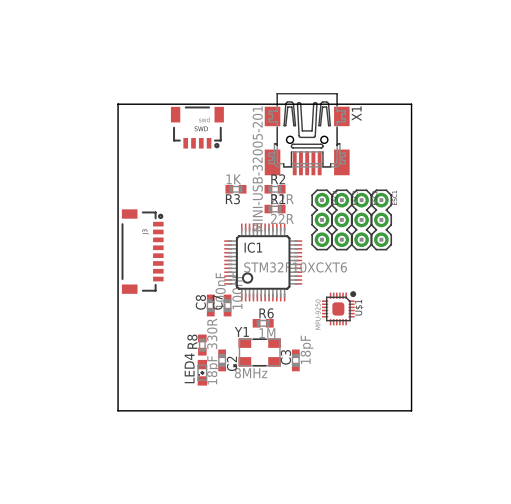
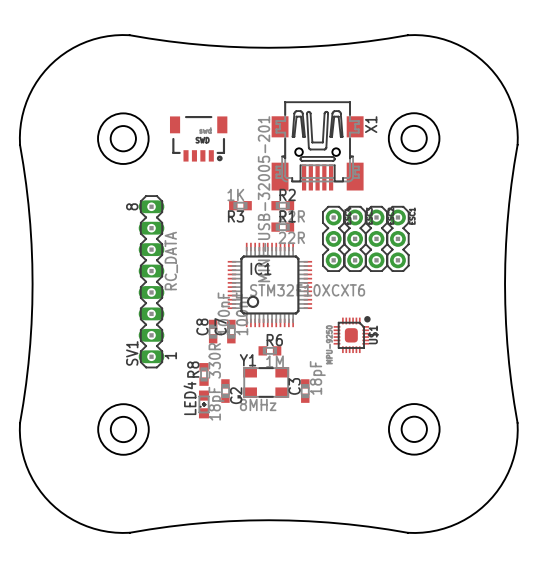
board edge: none -> (129, 35) (188, 43) (268, 47) (328, 45) (407, 35) (422, 35) (443, 39) (464, 47) (482, 60) (496, 76) (511, 101) (517, 130) (517, 144) (507, 224) (505, 283) (507, 343) (517, 422) (517, 437) (513, 459) (504, 479) (492, 497) (476, 512) (451, 526) (422, 532) (407, 532) (328, 522) (268, 520) (209, 522) (129, 532) (115, 532) (93, 528) (73, 520) (55, 507) (40, 491) (26, 466) (20, 437) (20, 423) (30, 343) (32, 284) (30, 224) (20, 145) (22, 116) (29, 95) (36, 82) (50, 65) (61, 55) (79, 44) (93, 39) (107, 36) (129, 35)
round board edge: none -> [388, 113, 440, 164]
round board edge: none -> [98, 113, 149, 164]
board edge: (118, 104) (411, 104) (411, 410) (118, 410) (118, 104) -> none
round board edge: none -> [110, 126, 136, 152]
round board edge: none -> [401, 125, 427, 152]
part: (142, 251) -> none
SV1: none -> RC_DATA (151, 281)
round board edge: none -> [98, 404, 149, 455]
round board edge: none -> [388, 404, 440, 455]
round board edge: none -> [110, 416, 137, 443]
round board edge: none -> [401, 416, 427, 442]

